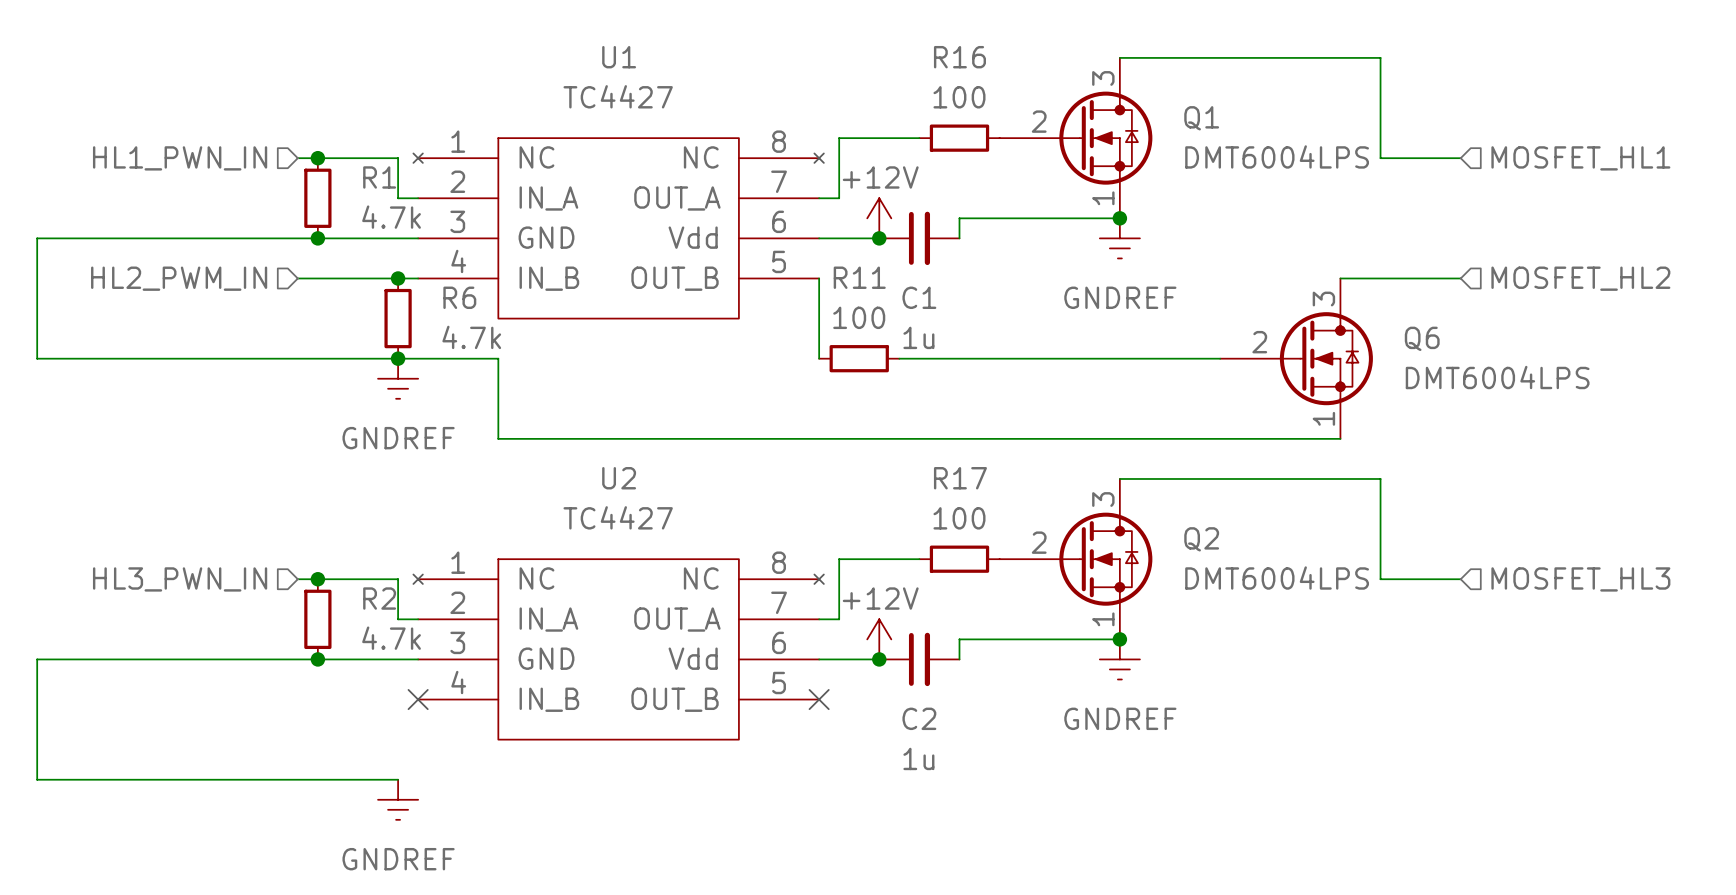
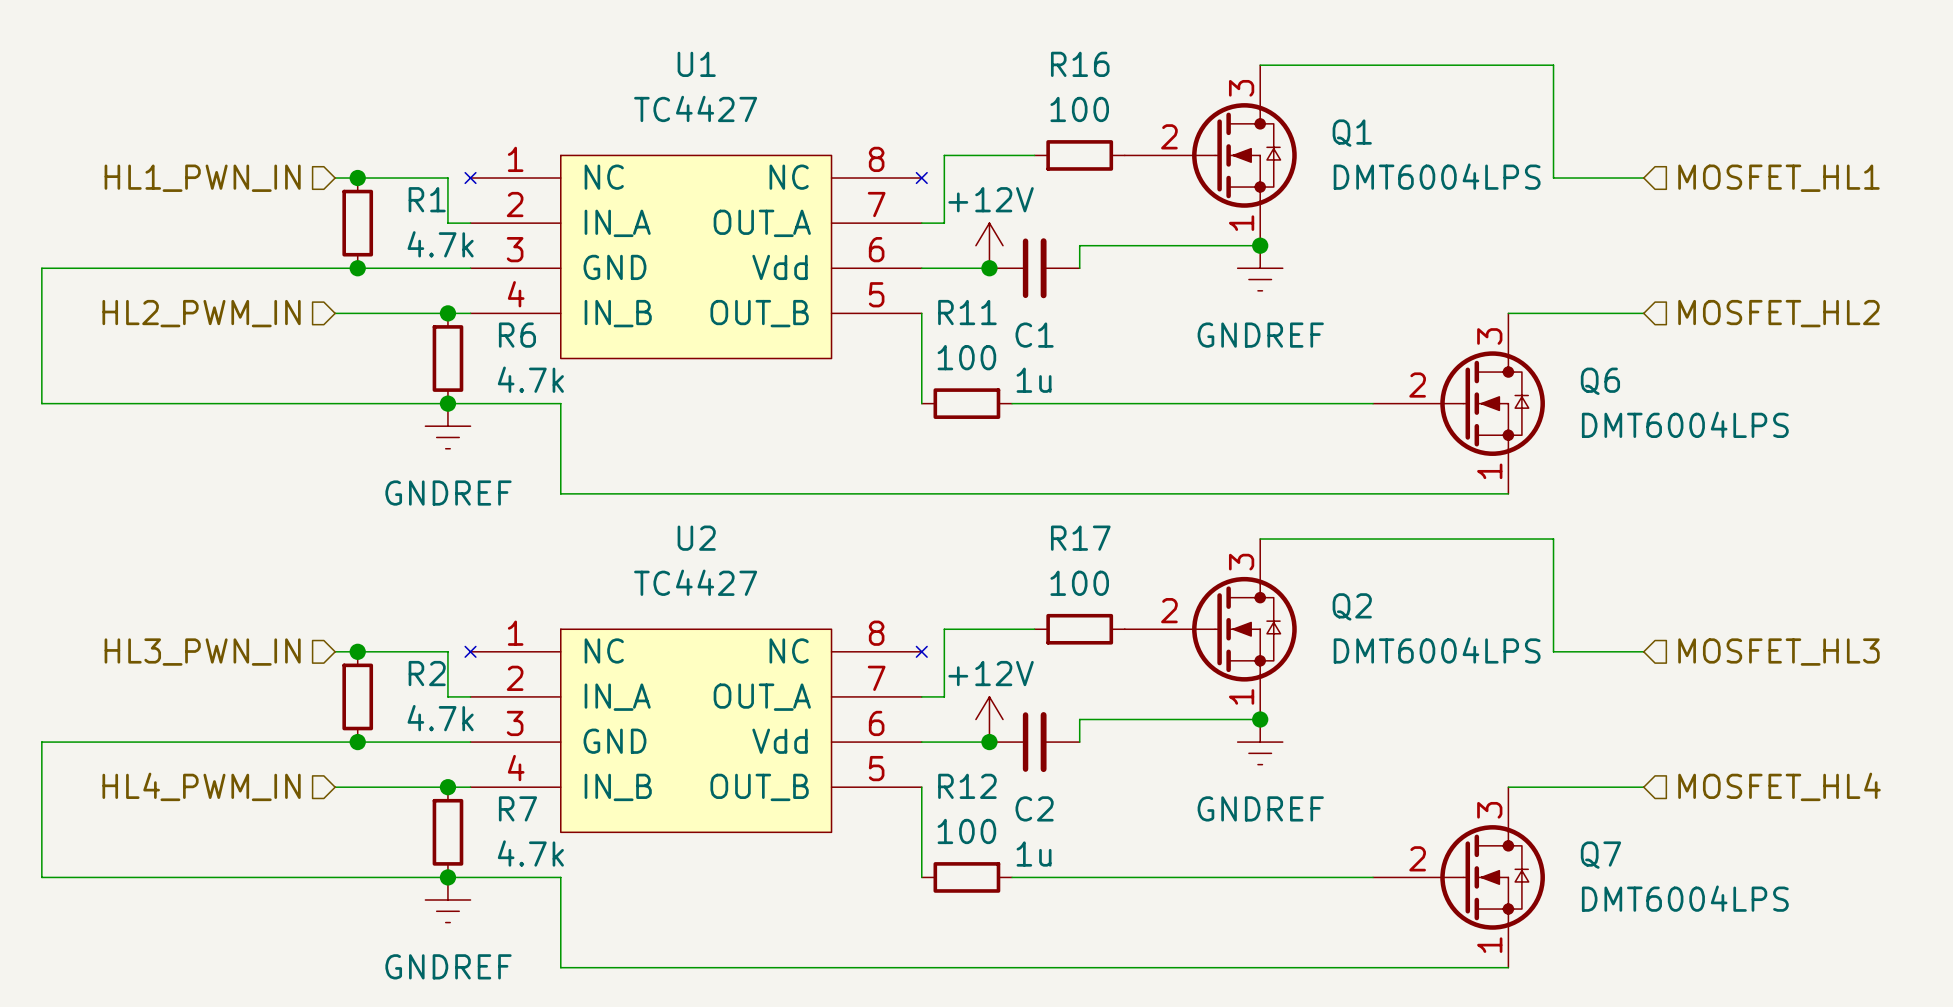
hierarchical label: none -> HL4_PWM_IN (201, 786)
wire: none -> (335, 787) (470, 787)
junction: none -> (447, 787)
no-connect mark: (418, 699) -> none
wire: none -> (921, 787) (921, 877)
no-connect mark: (819, 699) -> none
wire: none -> (1508, 787) (1643, 787)
hierarchical label: none -> MOSFET_HL4 (1779, 786)
R7: none -> 4.7k (447, 832)
wire: none -> (447, 877) (560, 877) (560, 967) (1508, 967)
junction: none -> (447, 877)
R12: none -> 100 (966, 877)
wire: none -> (1012, 877) (1373, 877)
Q7: none -> DMT6004LPS (1458, 877)

